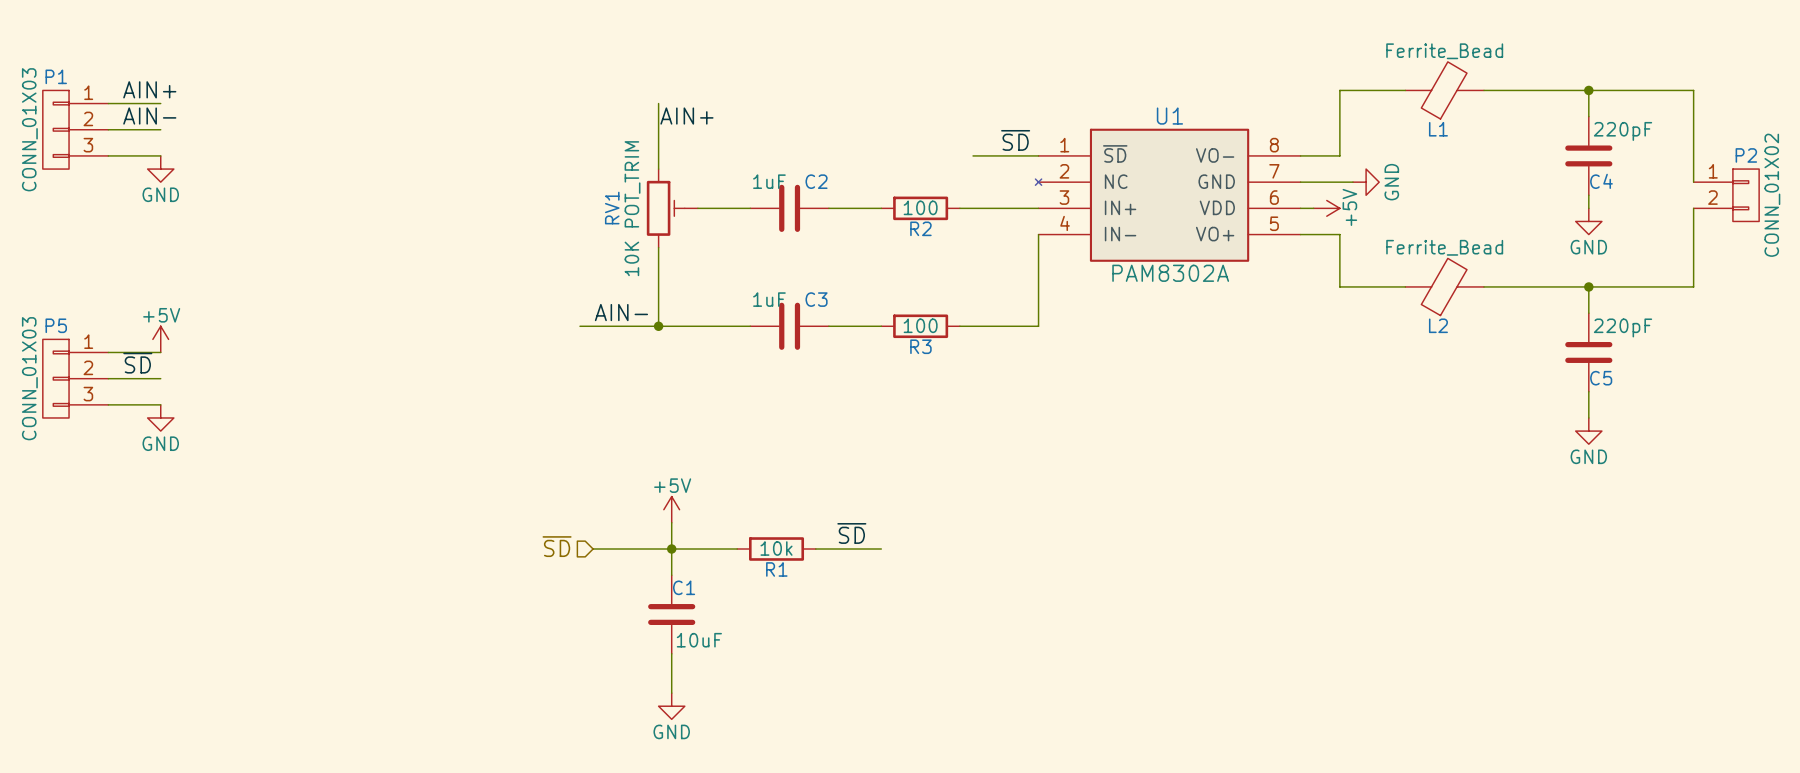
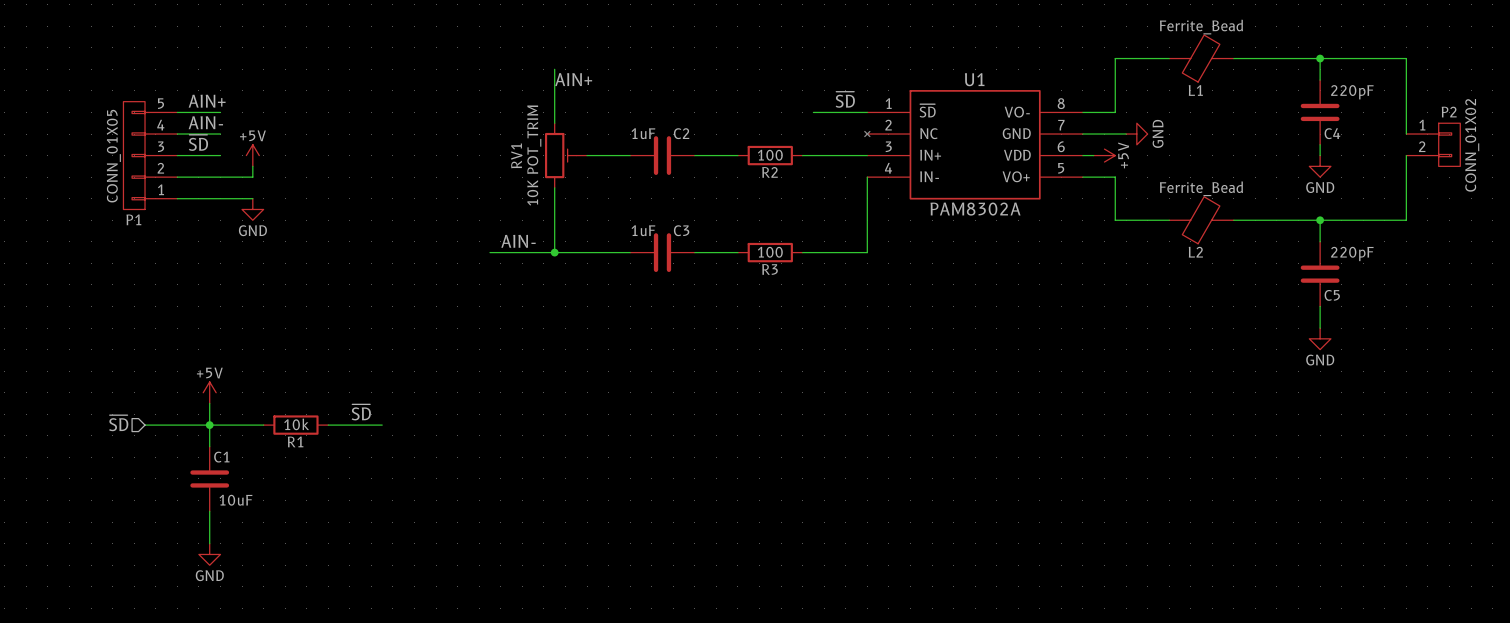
P1 name position: P1 (56, 76) -> P1 (133, 219)
label position: AIN+ (149, 89) -> AIN+ (207, 101)
P1 symbol: [42, 90, 109, 170] -> [123, 101, 178, 210]
wire: (108, 103) (160, 103) -> (177, 112) (220, 112)
label position: AIN- (149, 116) -> AIN- (205, 122)
P1 value: CONN_01X03 (29, 129) -> CONN_01X05 (113, 156)
wire: (108, 129) (160, 129) -> (177, 134) (220, 134)
wire: (108, 155) (160, 155) -> (177, 155) (220, 155)
power symbol: GND (160, 169) -> none
label: none -> ~{SD} (198, 142)
power symbol: none -> +5V (252, 155)
wire: none -> (252, 166) (252, 177) (177, 177)
wire: none -> (177, 198) (252, 198)
power symbol: none -> GND (252, 209)
power symbol: +5V (160, 339) -> none
wire: (108, 352) (160, 352) -> none
label: ~{SD} (137, 363) -> none
P5: CONN_01X03 (75, 378) -> none
wire: (108, 378) (160, 378) -> none
wire: (108, 404) (160, 404) -> none
power symbol: GND (160, 417) -> none
power symbol: none -> +5V (209, 392)
wire: none -> (209, 403) (209, 446)
power symbol: +5V (671, 509) -> none
label: none -> ~{SD} (361, 412)
wire: (671, 522) (671, 575) -> none
hierarchical label: none -> ~{SD} (118, 423)
label: ~{SD} (851, 533) -> none
wire: none -> (145, 425) (263, 425)
junction: none -> (209, 425)
wire: none -> (328, 425) (382, 425)
hierarchical label: ~{SD} (557, 546) -> none
wire: (593, 549) (737, 549) -> none
junction: (671, 549) -> none
R1 position: (776, 549) -> (295, 425)
wire: (815, 549) (881, 549) -> none
C1 position: (671, 614) -> (209, 478)
wire: none -> (209, 511) (209, 543)
wire: (671, 653) (671, 693) -> none
power symbol: none -> GND (209, 554)
power symbol: GND (671, 706) -> none

